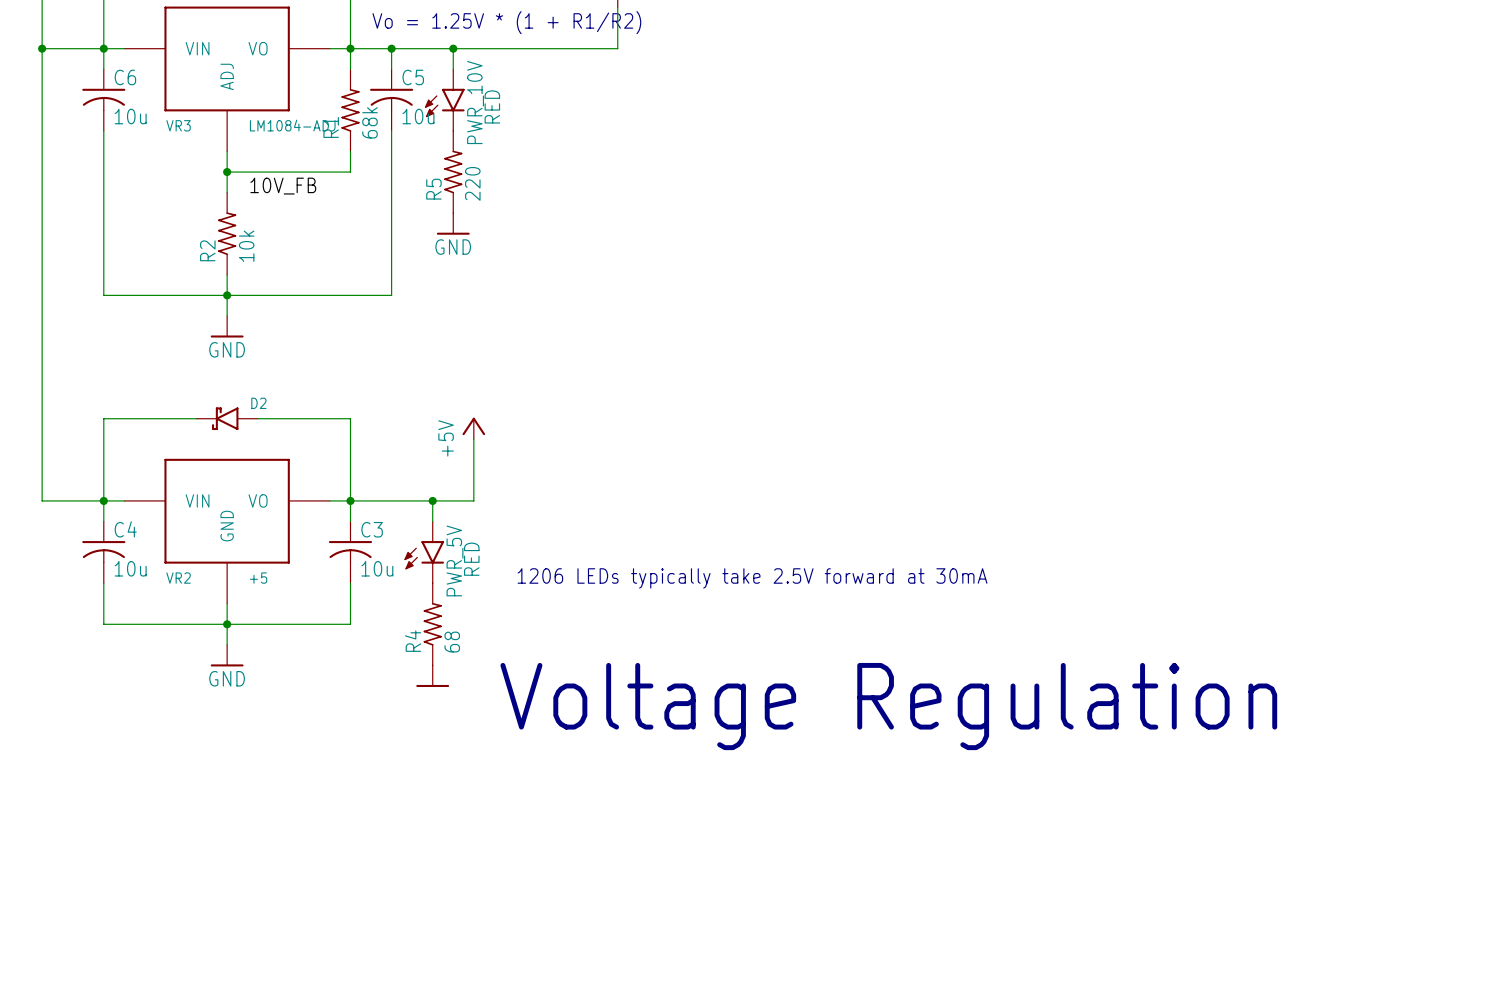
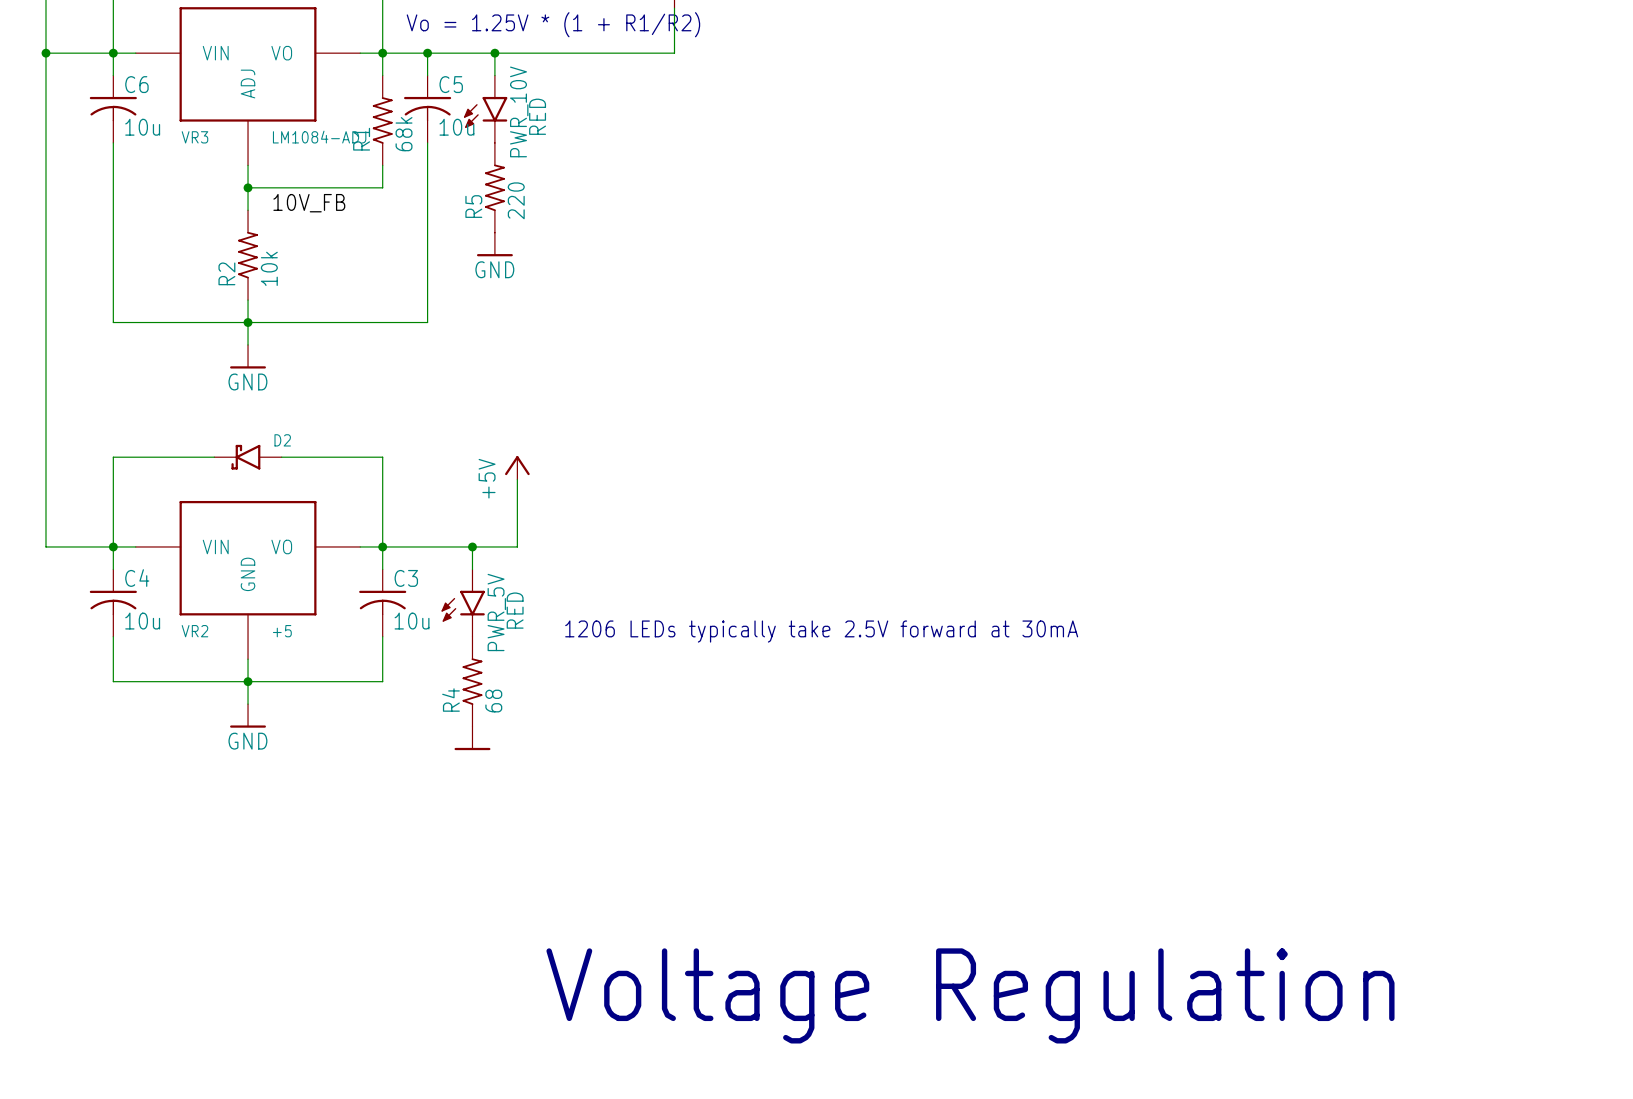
text: Voltage Regulation (888, 706) -> none
text: none -> Voltage Regulation (970, 995)

